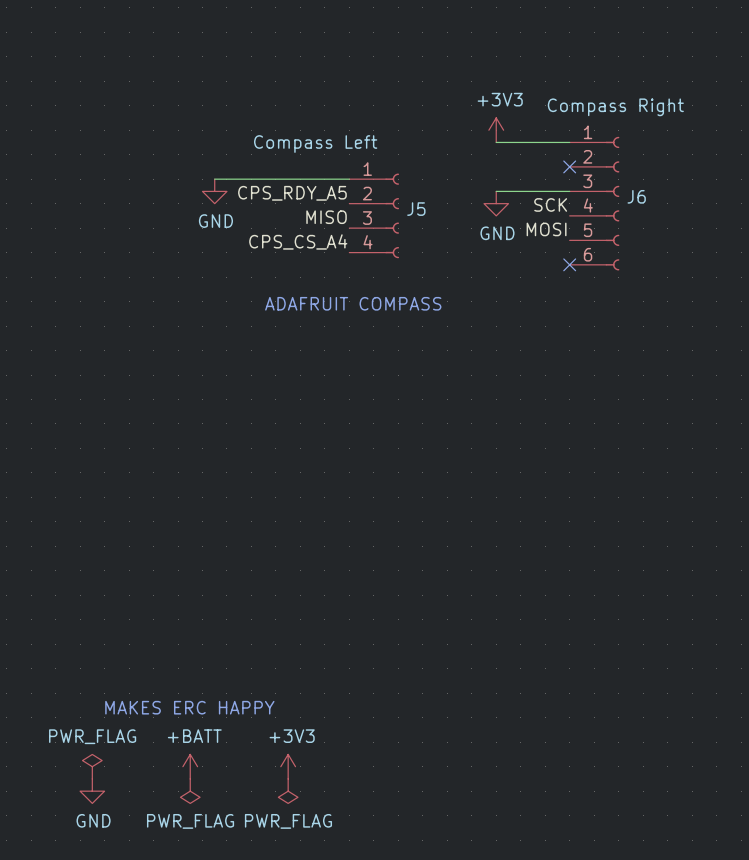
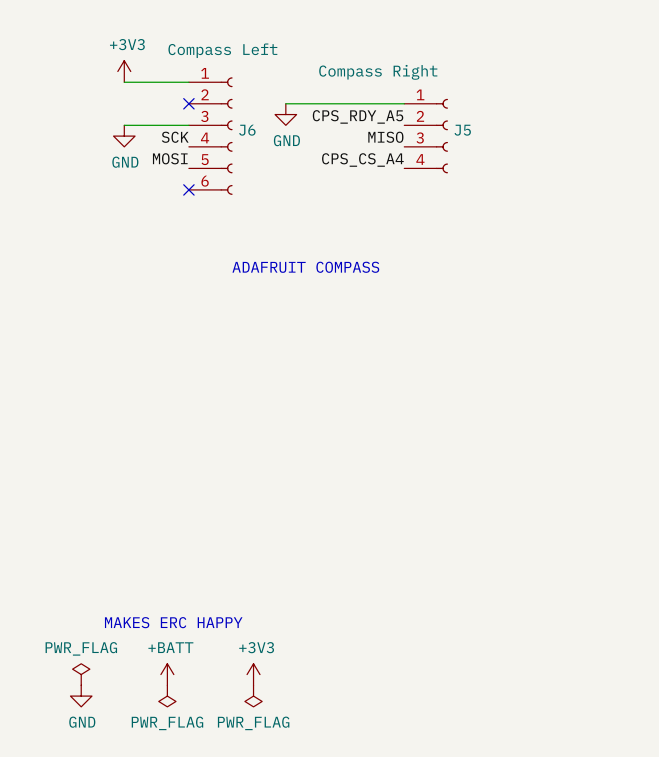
power symbol: none -> +3V3 (124, 71)
wire: none -> (124, 82) (188, 82)
J6 value: Compass Right (615, 107) -> Compass Left (222, 50)
no-connect mark: none -> (188, 103)
power symbol: none -> GND (285, 114)
power symbol: +3V3 (496, 130) -> none
wire: none -> (124, 125) (188, 125)
wire: (496, 142) (569, 142) -> none
J5 value: Compass Left (315, 144) -> Compass Right (378, 72)
power symbol: none -> GND (124, 136)
label: none -> SCK (175, 137)
no-connect mark: (569, 166) -> none
wire: (214, 179) (349, 179) -> (285, 103) (404, 103)
label: none -> MOSI (170, 158)
power symbol: GND (214, 191) -> none
wire: (496, 191) (569, 191) -> none
label position: CPS_RDY_A5 (292, 193) -> CPS_RDY_A5 (358, 116)
power symbol: GND (496, 203) -> none
J6 position: (594, 203) -> (210, 136)
label: SCK (550, 204) -> none
no-connect mark: none -> (188, 189)
J5 position: (374, 215) -> (426, 136)
label position: MISO (326, 217) -> MISO (385, 137)
label: MOSI (546, 229) -> none
label position: CPS_CS_A4 (298, 241) -> CPS_CS_A4 (362, 160)
no-connect mark: (569, 264) -> none

